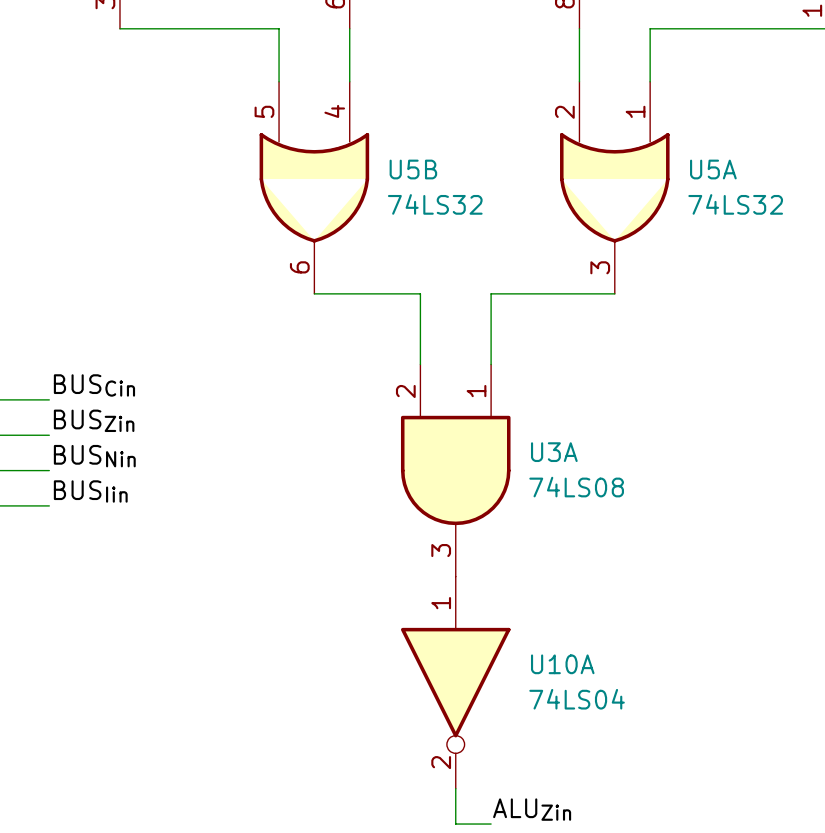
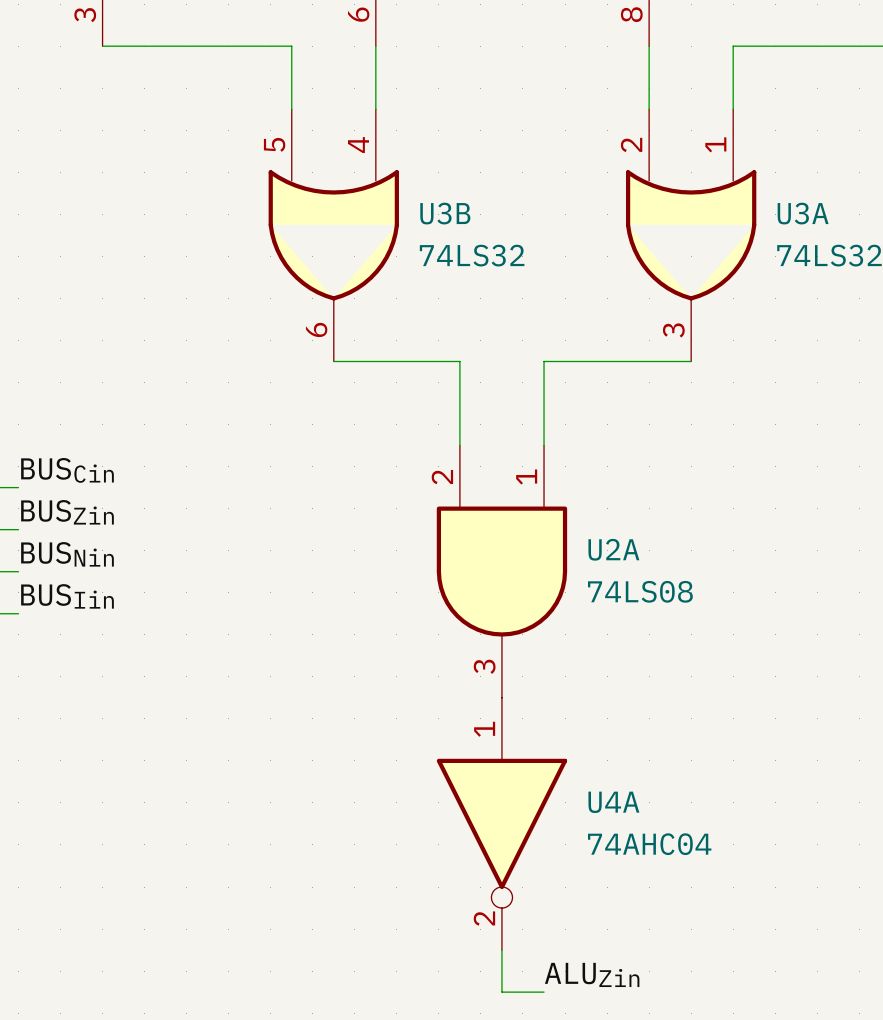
U5B name: U5B (413, 169) -> U3B (445, 213)
U5A name: U5A (713, 169) -> U3A (803, 213)
U3A name: U3A (554, 452) -> U2A (613, 549)
U10A name: U10A (562, 664) -> U4A (613, 802)
U10A value: 74LS04 (577, 699) -> 74AHC04 (649, 844)

